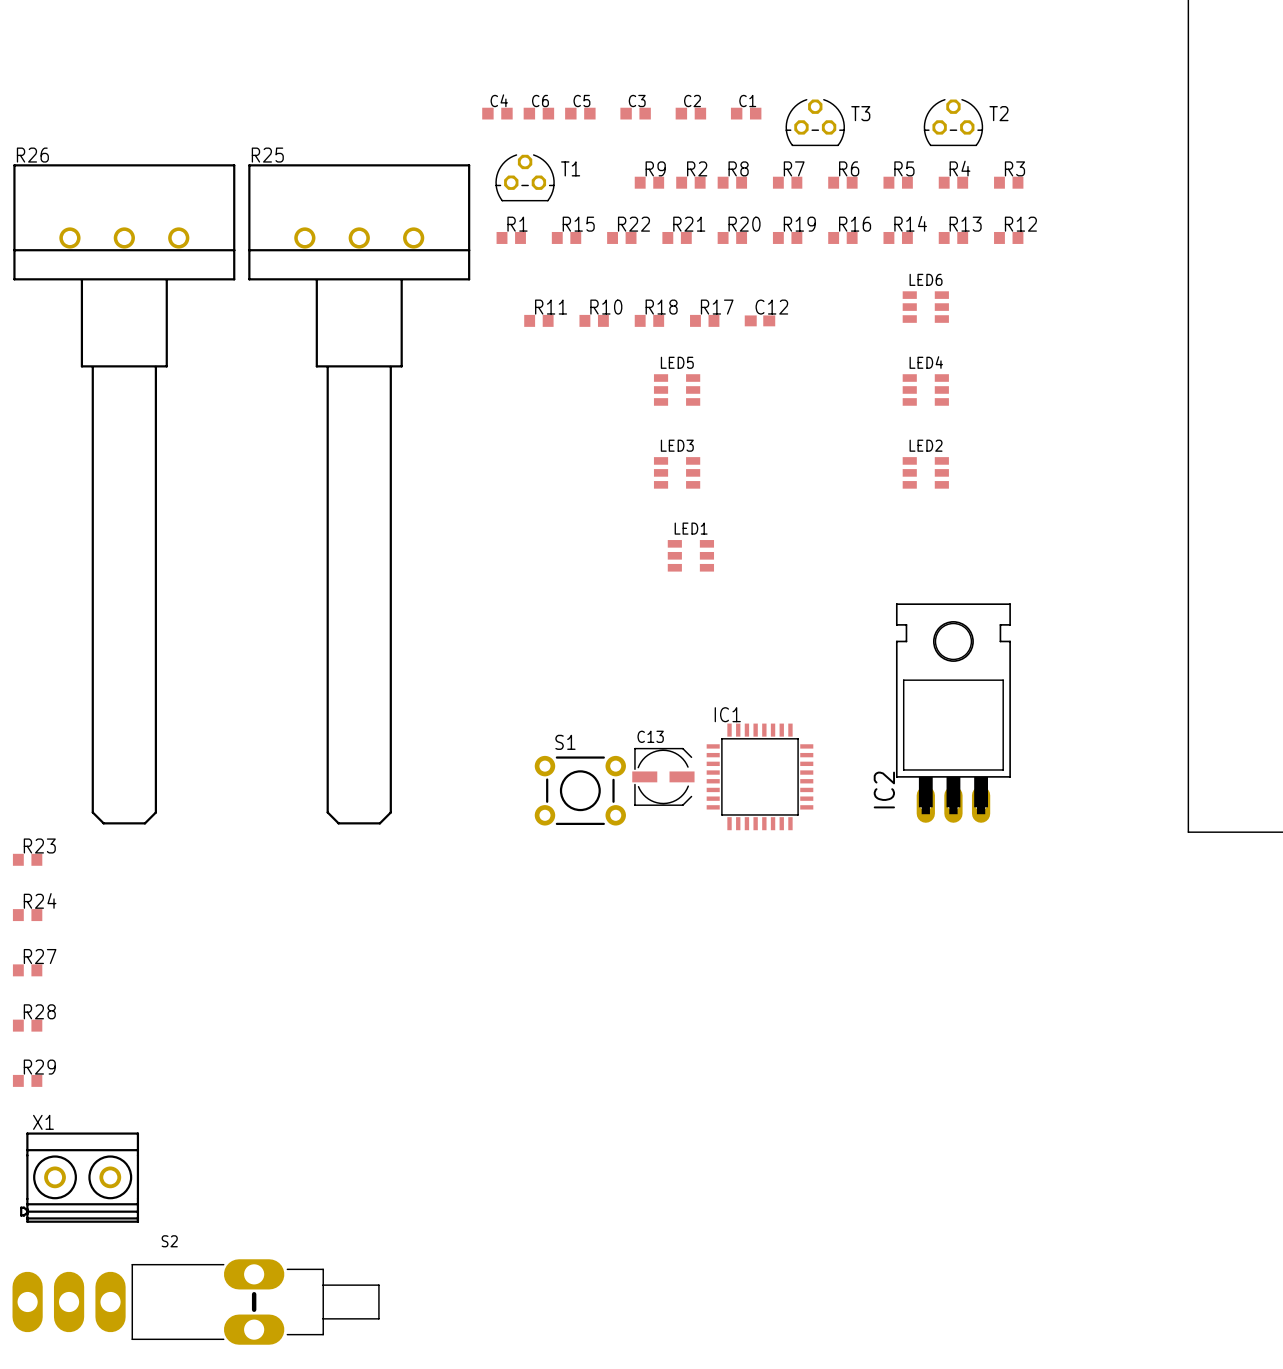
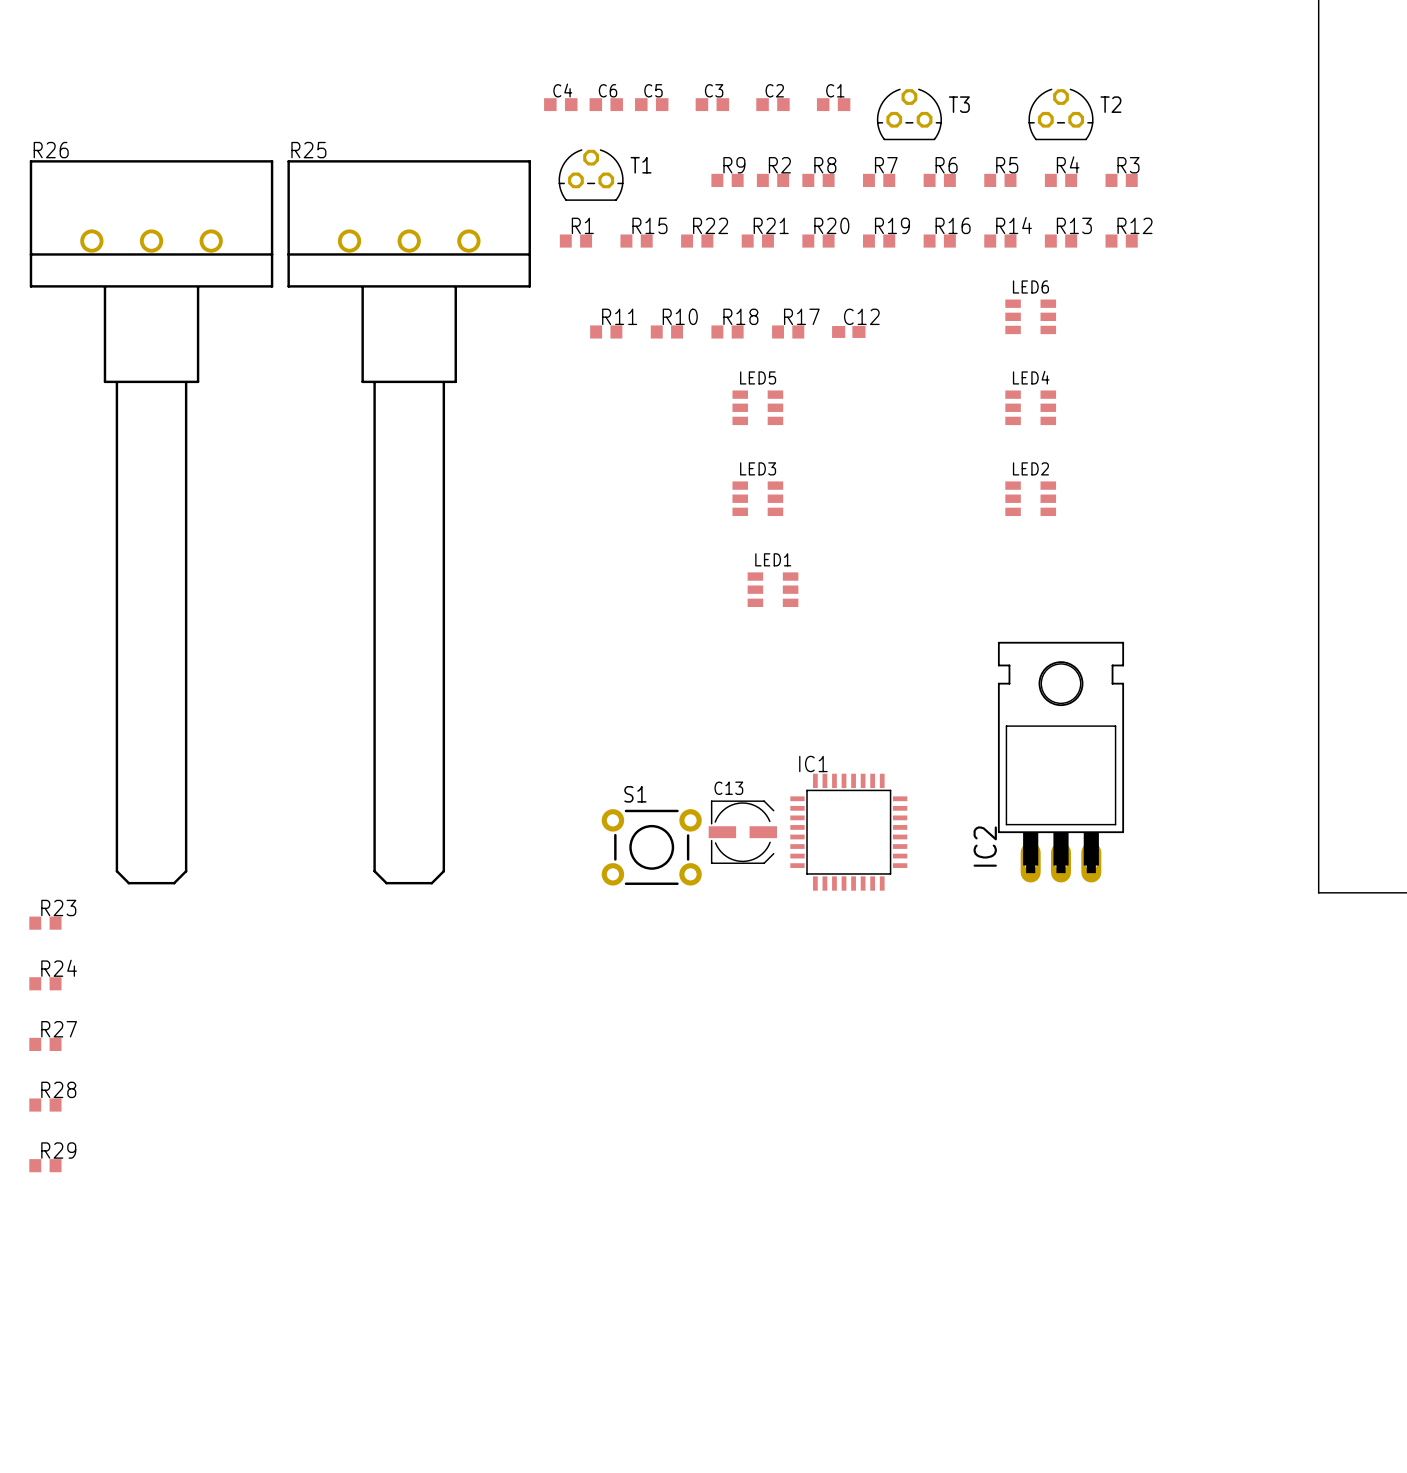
X1: (79, 1177) -> none
S2: (196, 1301) -> none

